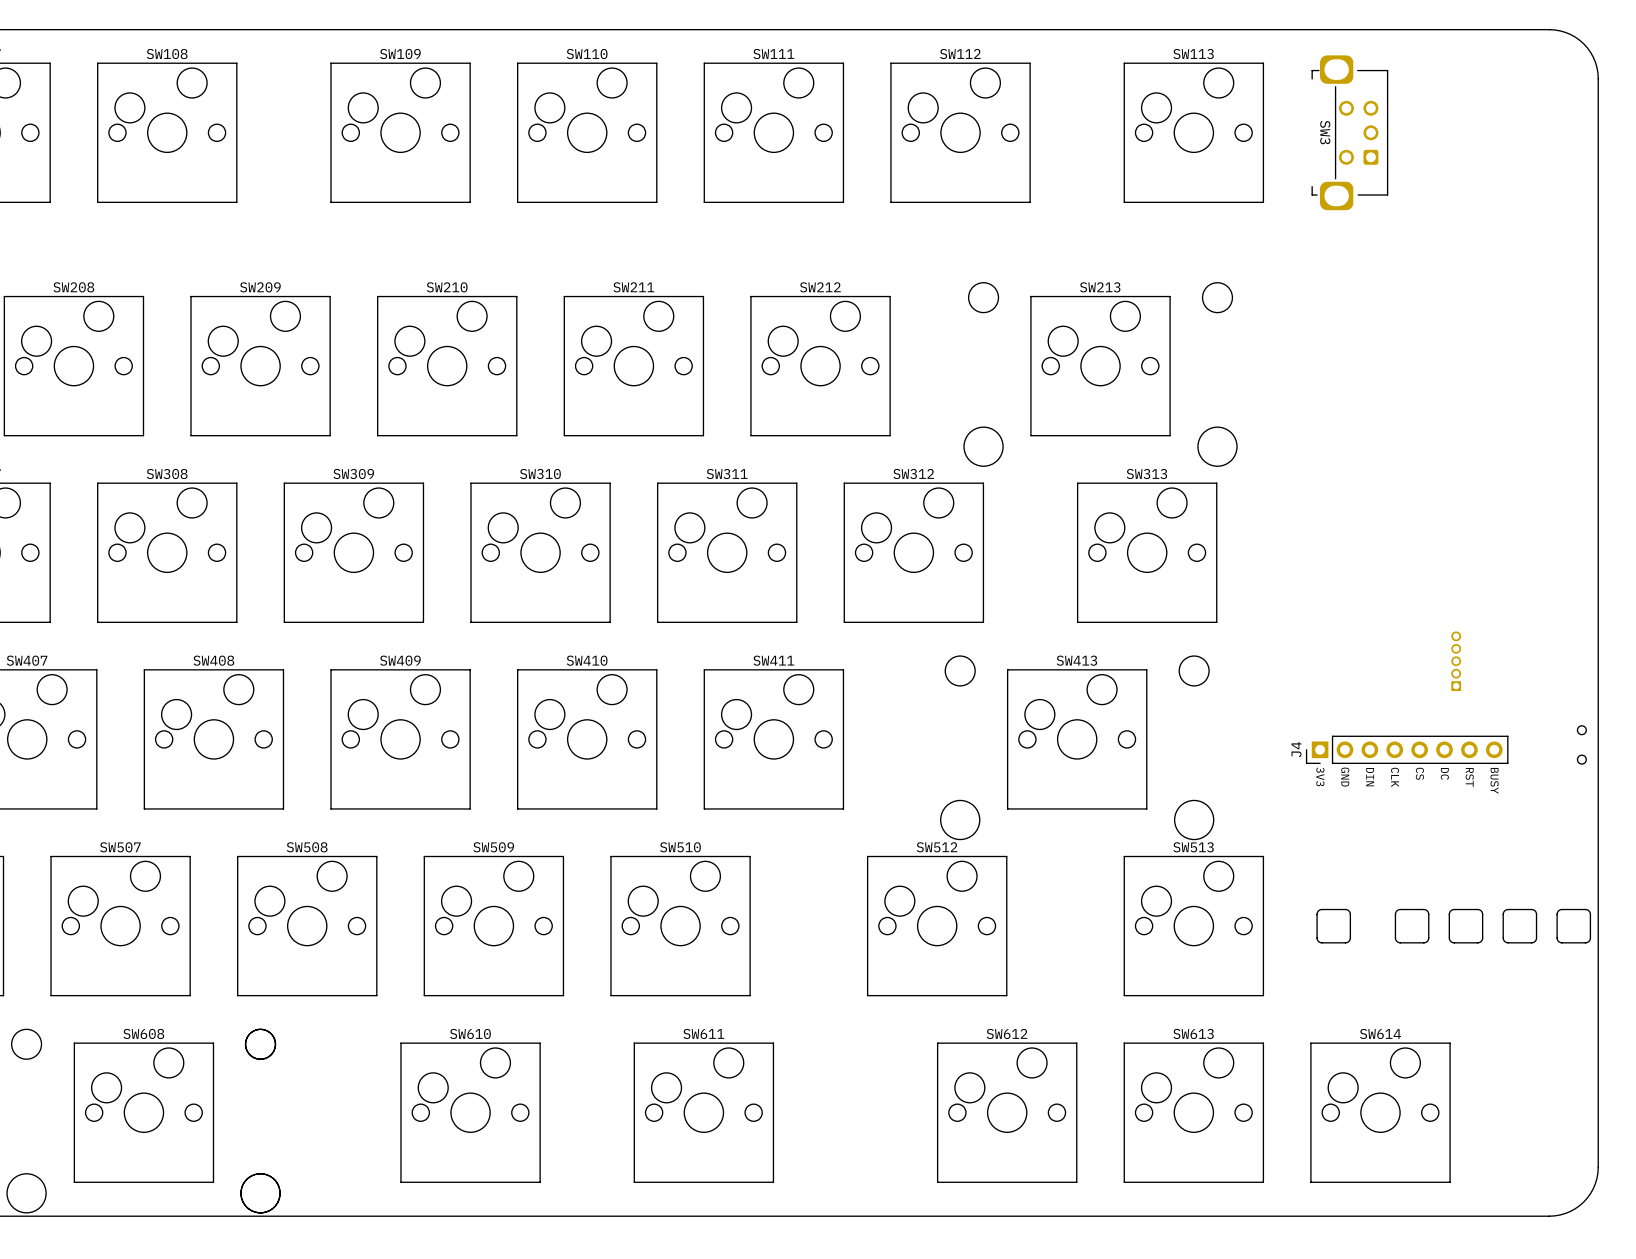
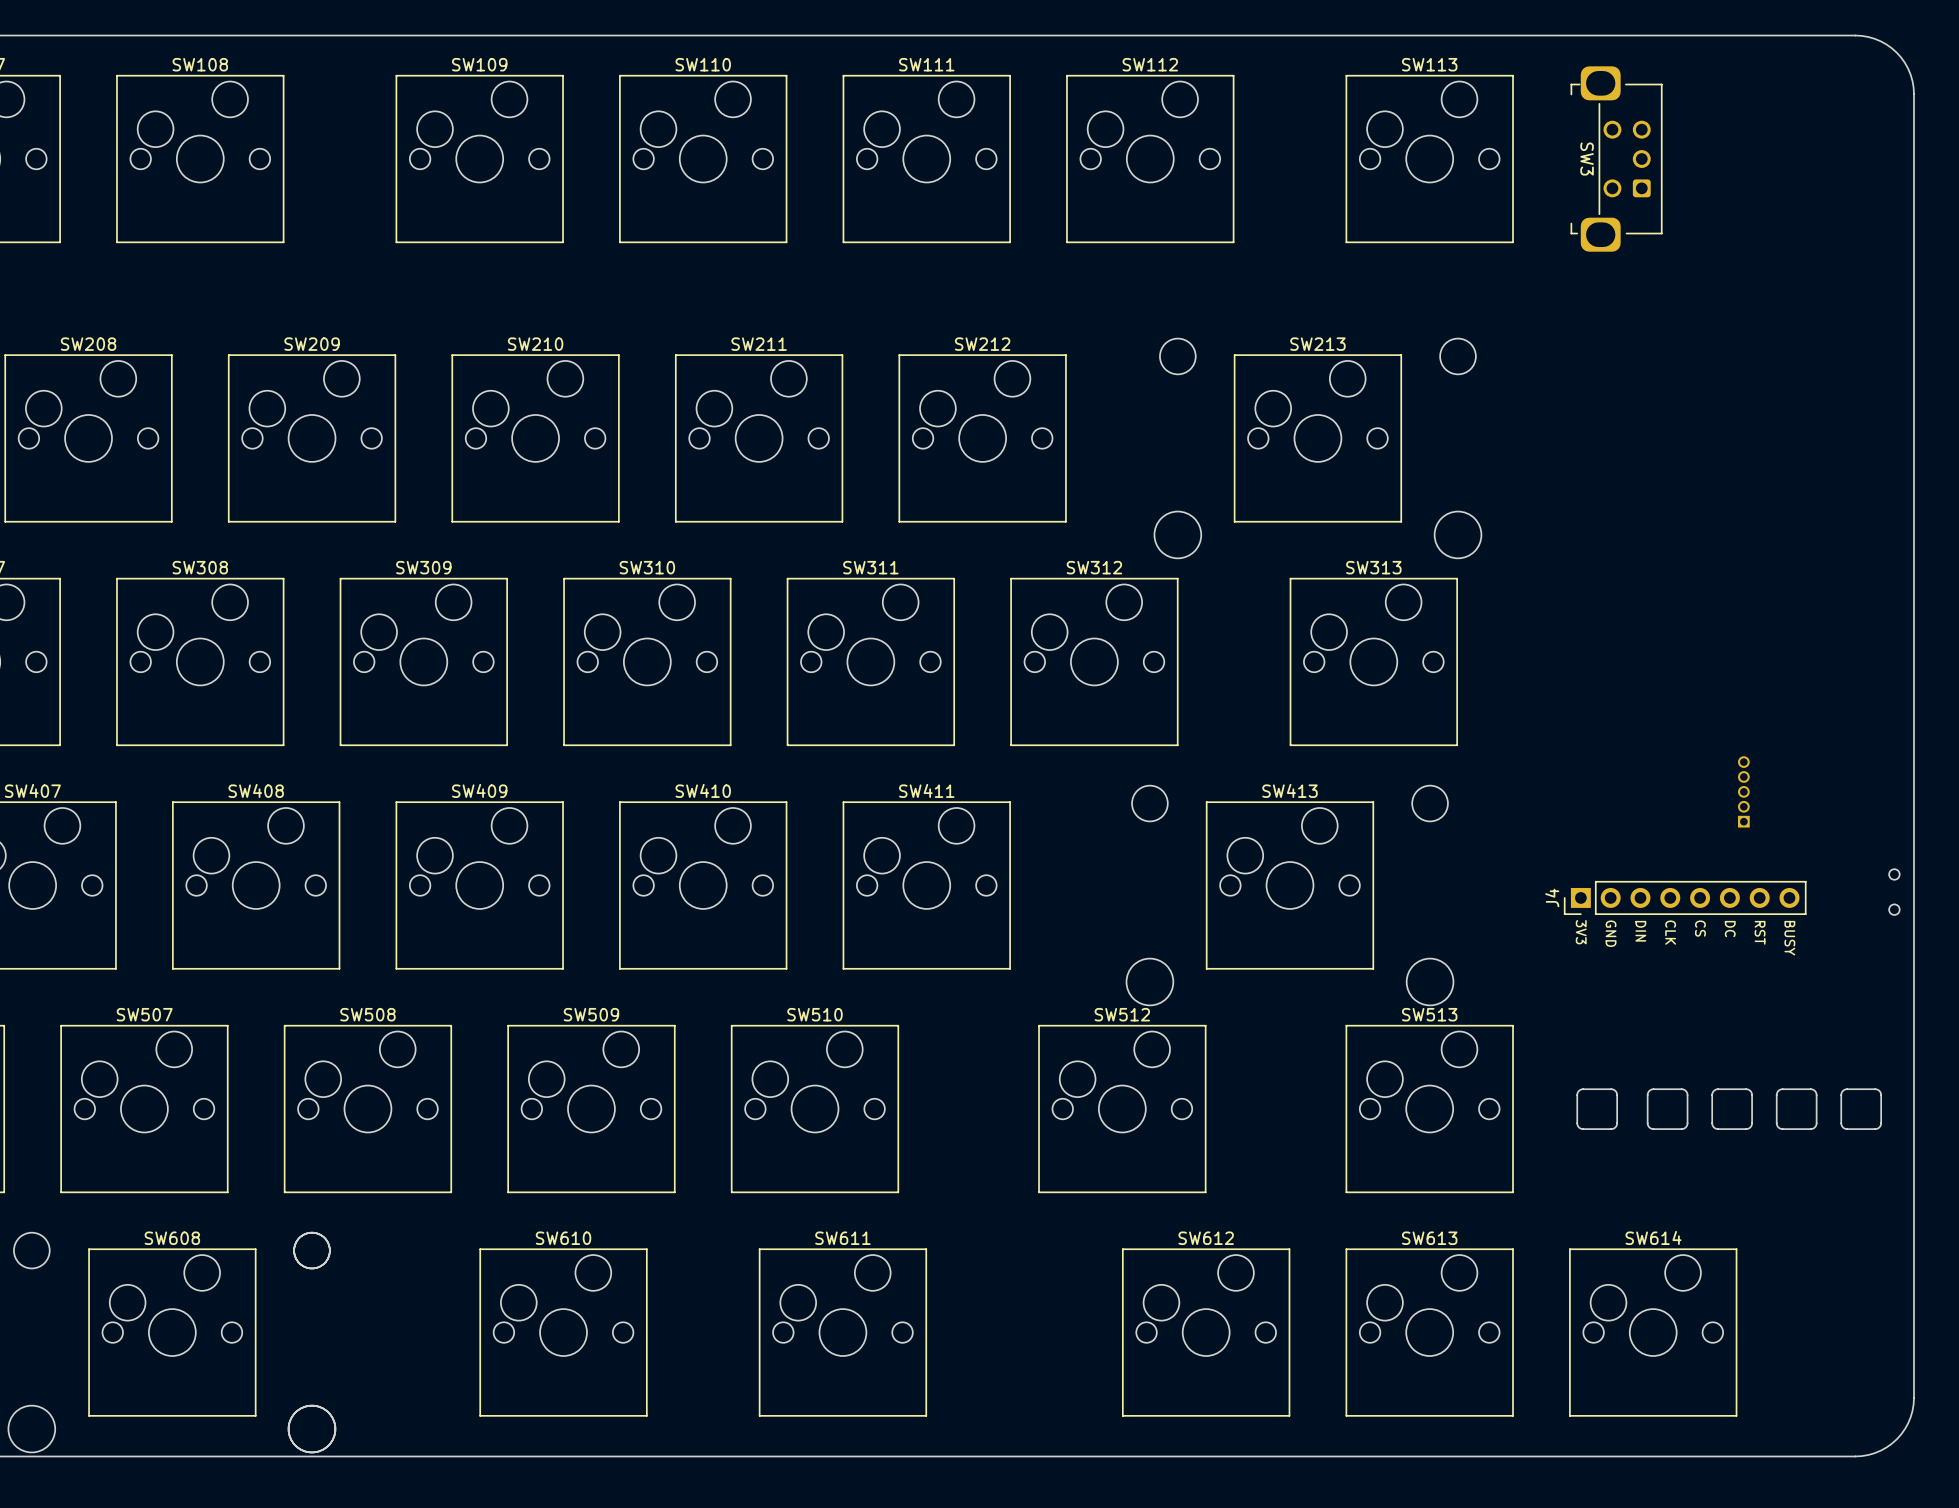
part: none -> (1667, 1109)
part: (1412, 926) -> none
part: none -> (1732, 1109)
part: (1465, 926) -> none
part: none -> (1796, 1109)
part: (1519, 926) -> none
part: none -> (1861, 1109)
part: (1573, 926) -> none

